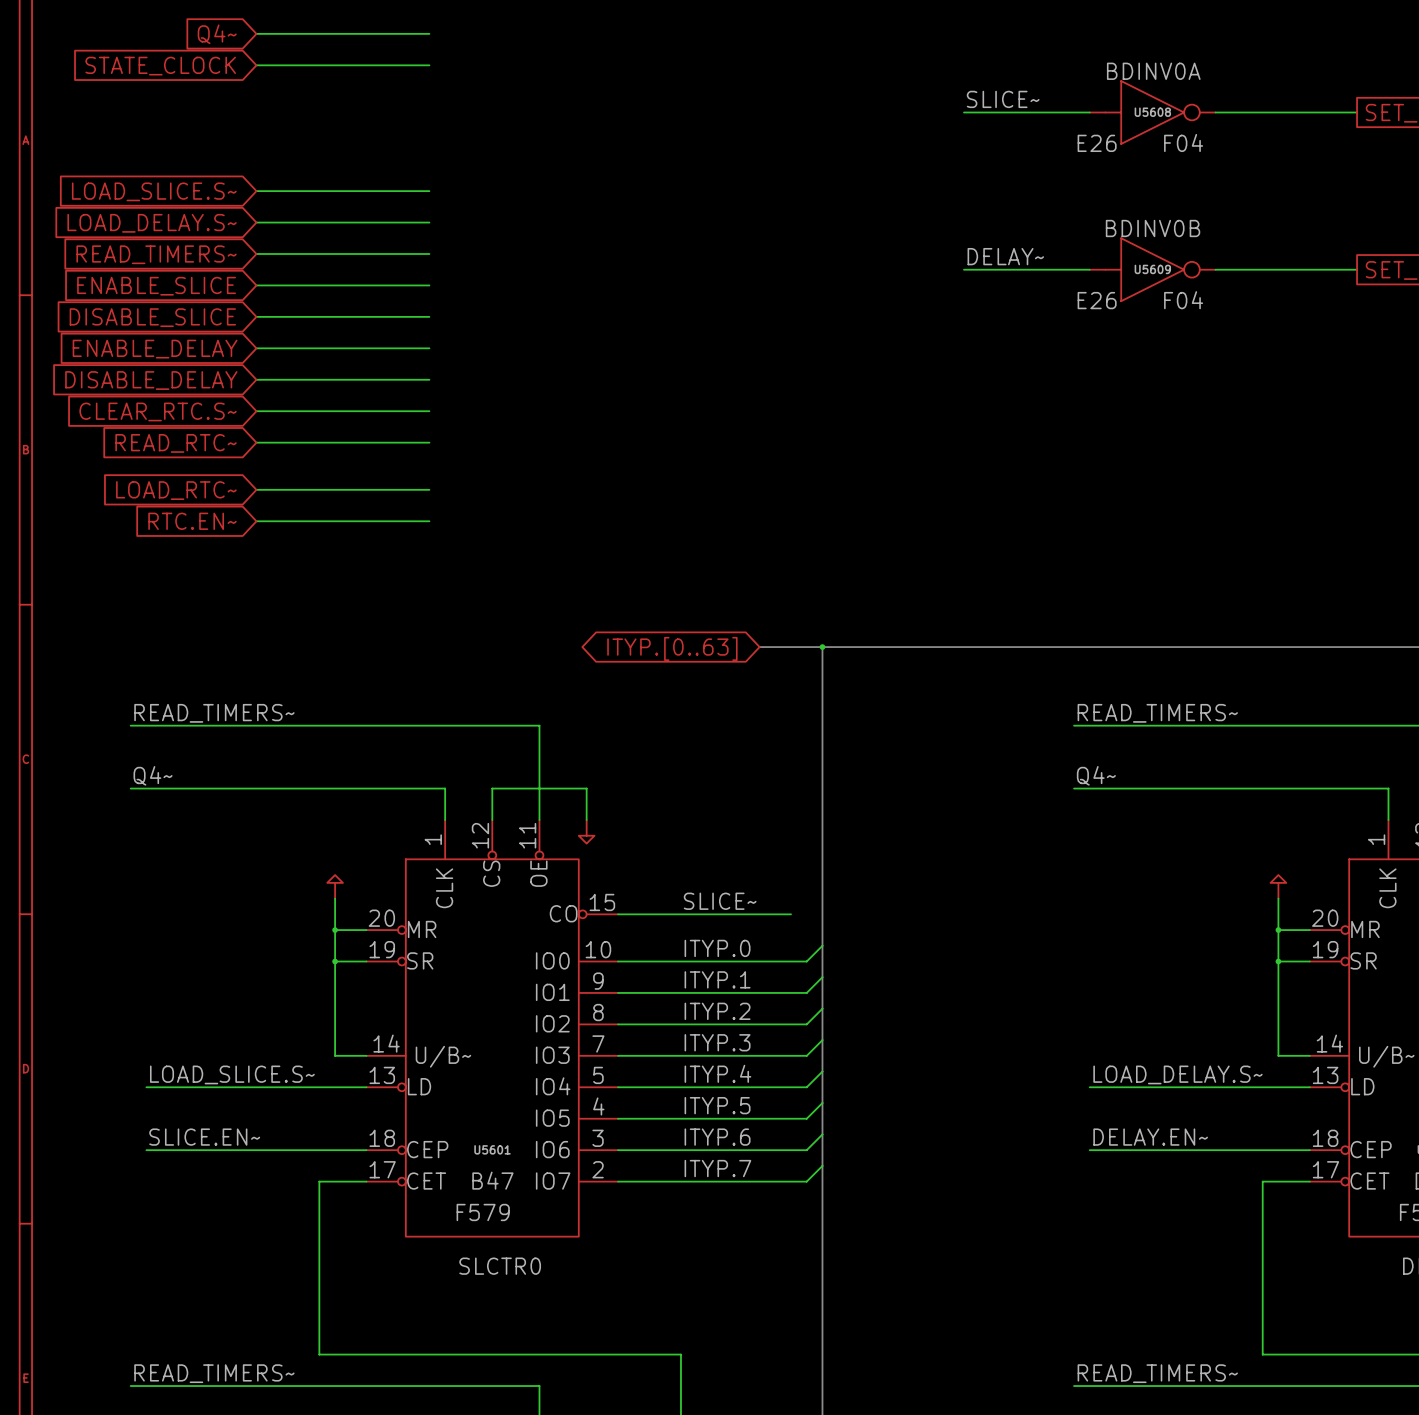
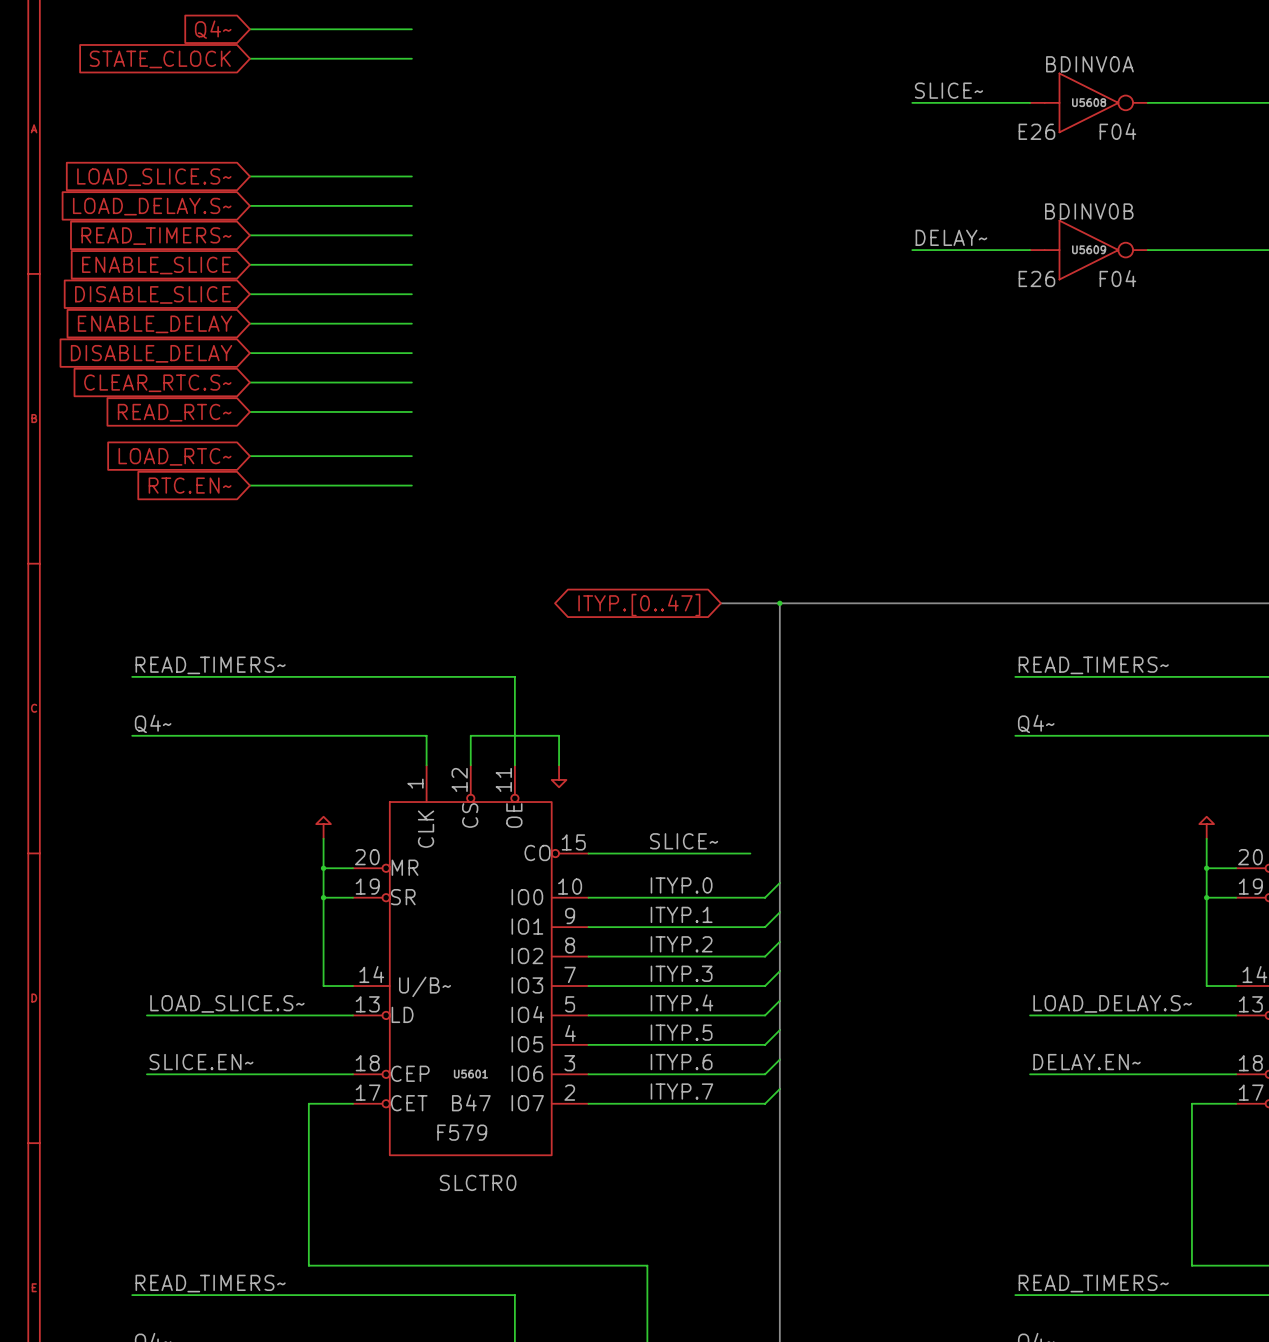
global label: ITYP.[0..63] (672, 648) -> ITYP.[0..47] (639, 605)

